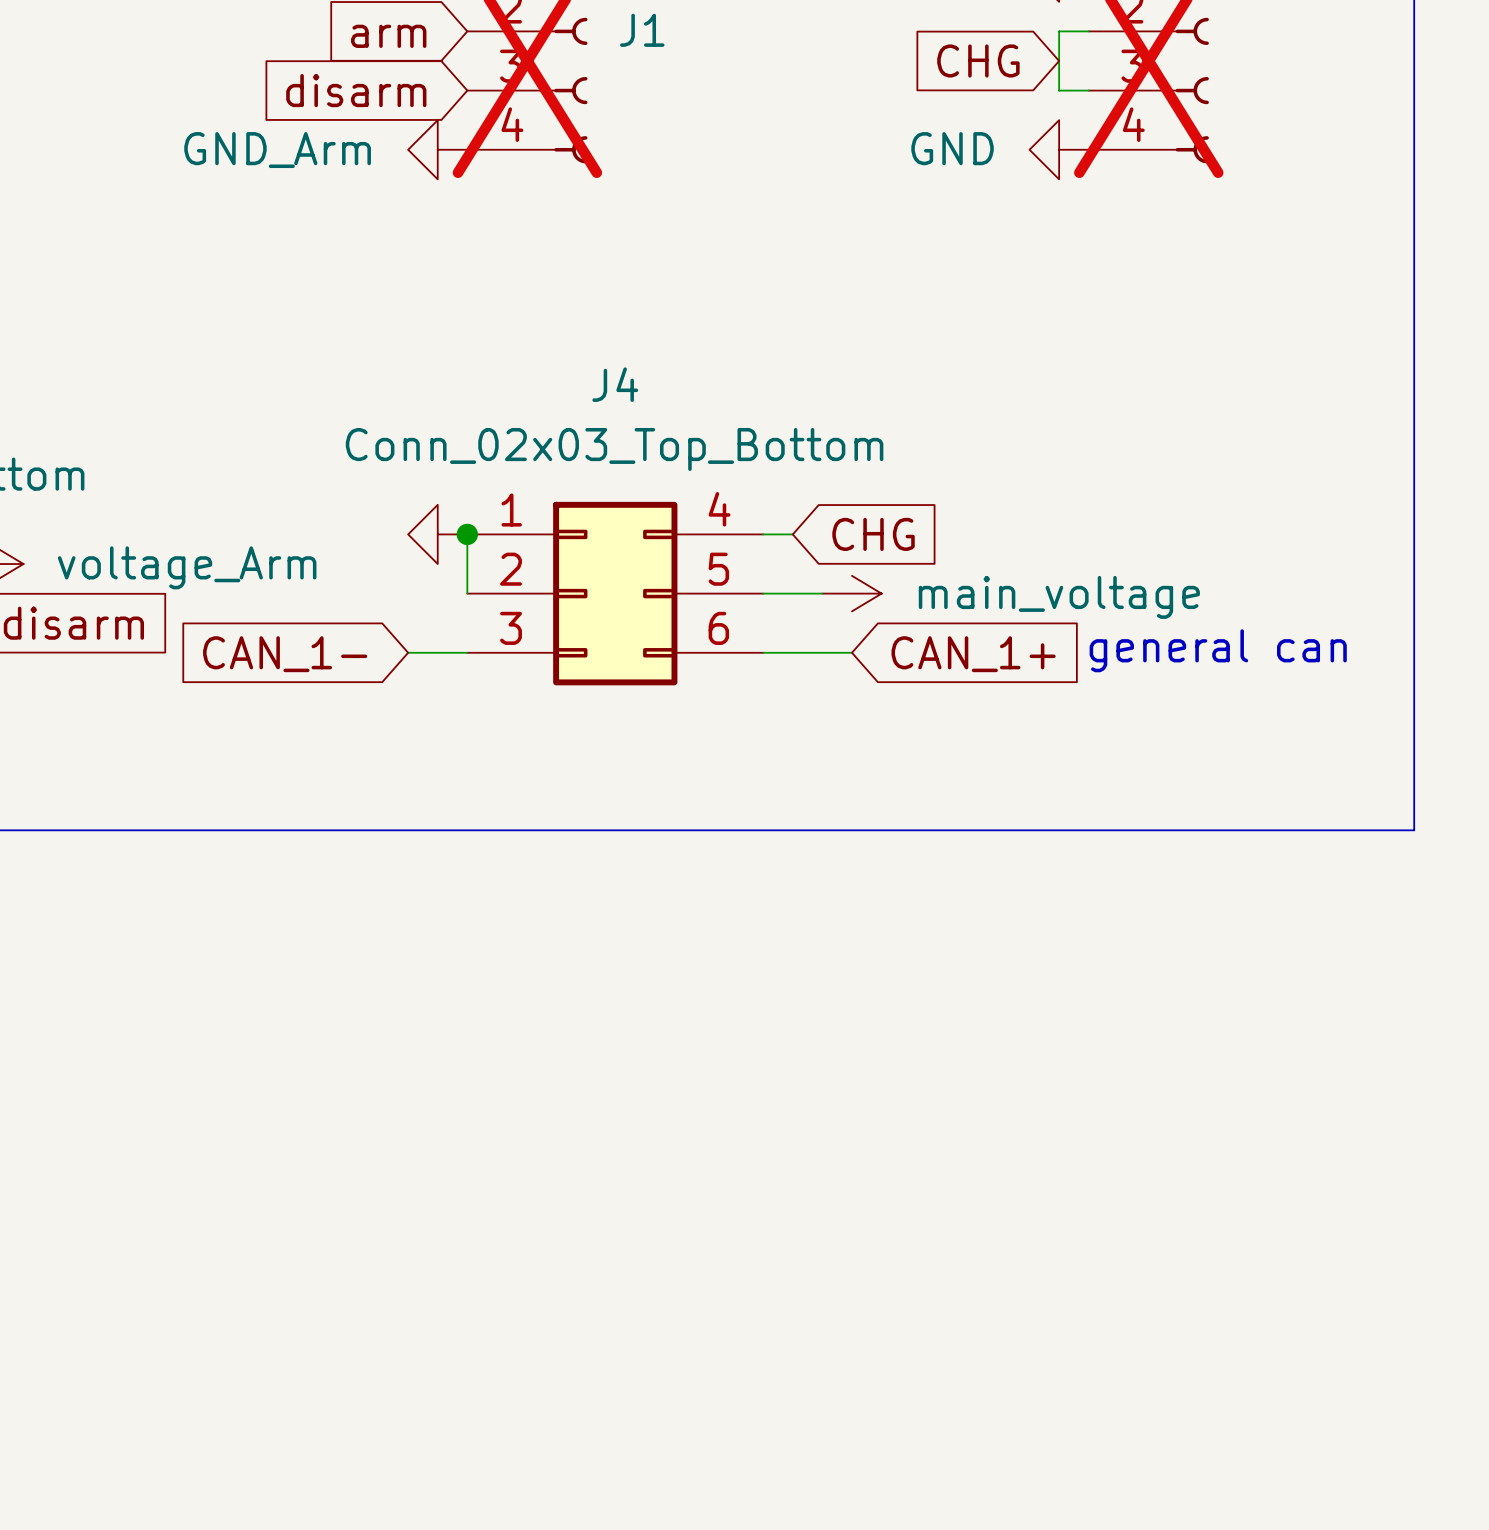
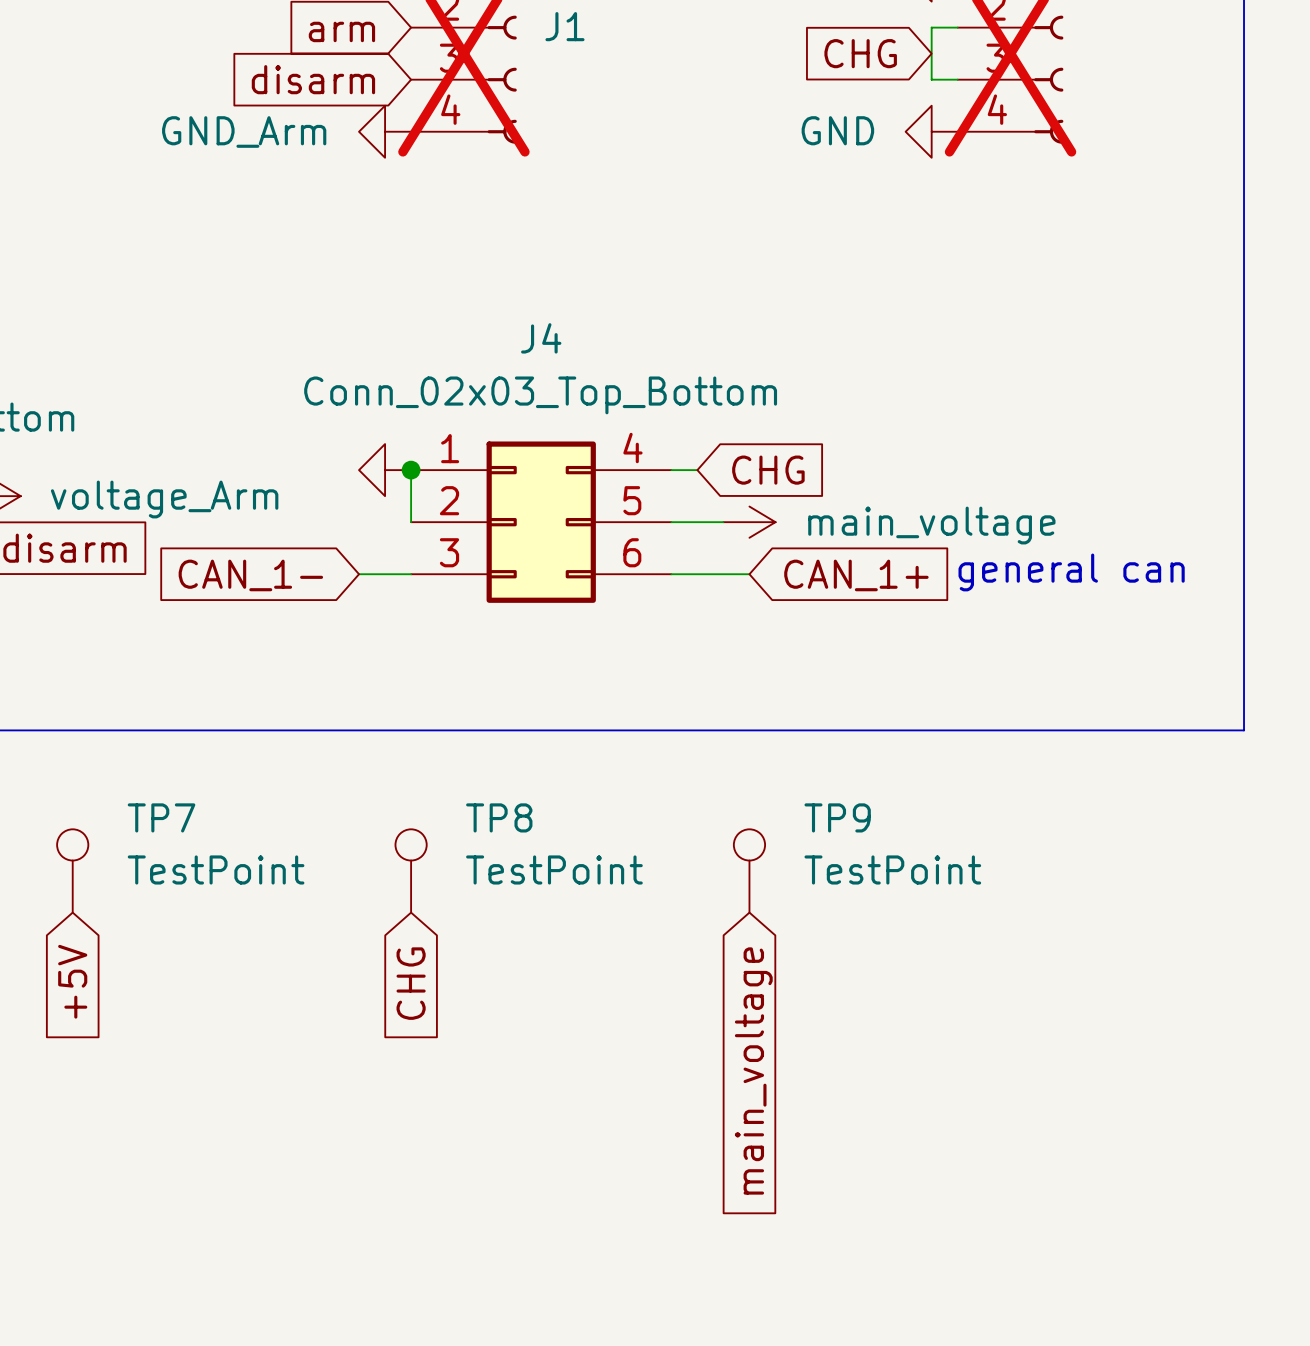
TP7: none -> TestPoint (72, 870)
TP8: none -> TestPoint (411, 870)
TP9: none -> TestPoint (749, 870)
global label: none -> +5V (72, 981)
global label: none -> CHG (411, 983)
global label: none -> main_voltage (753, 1070)

